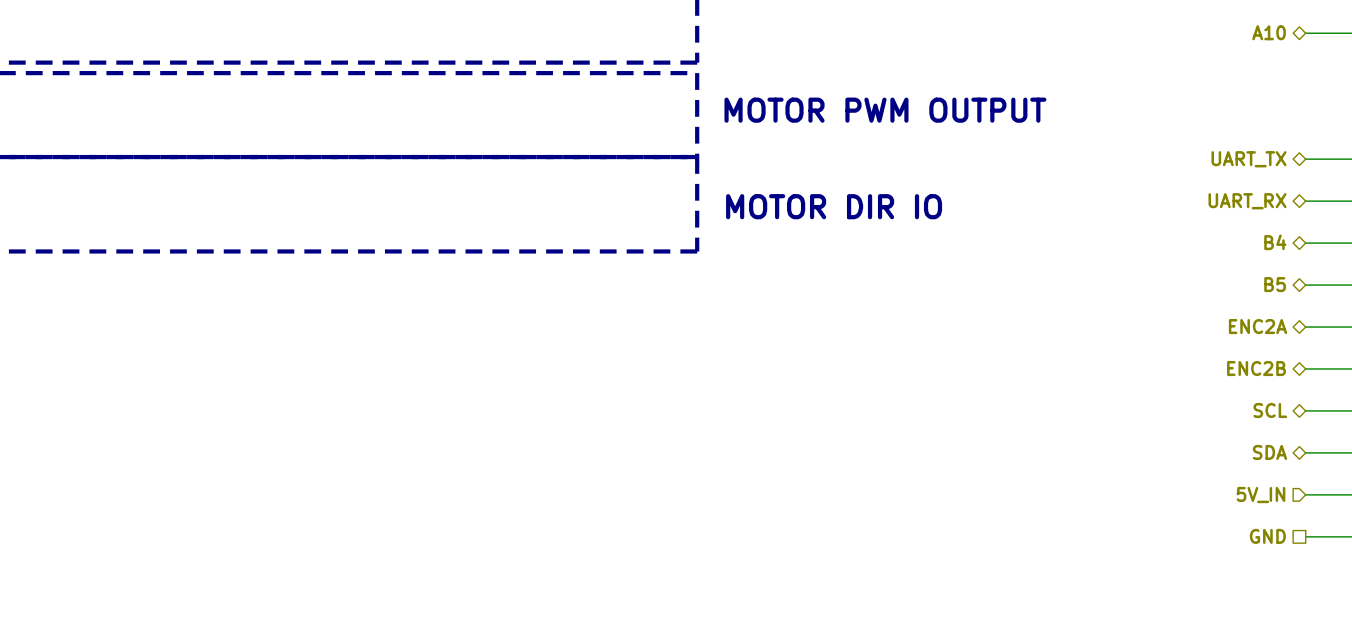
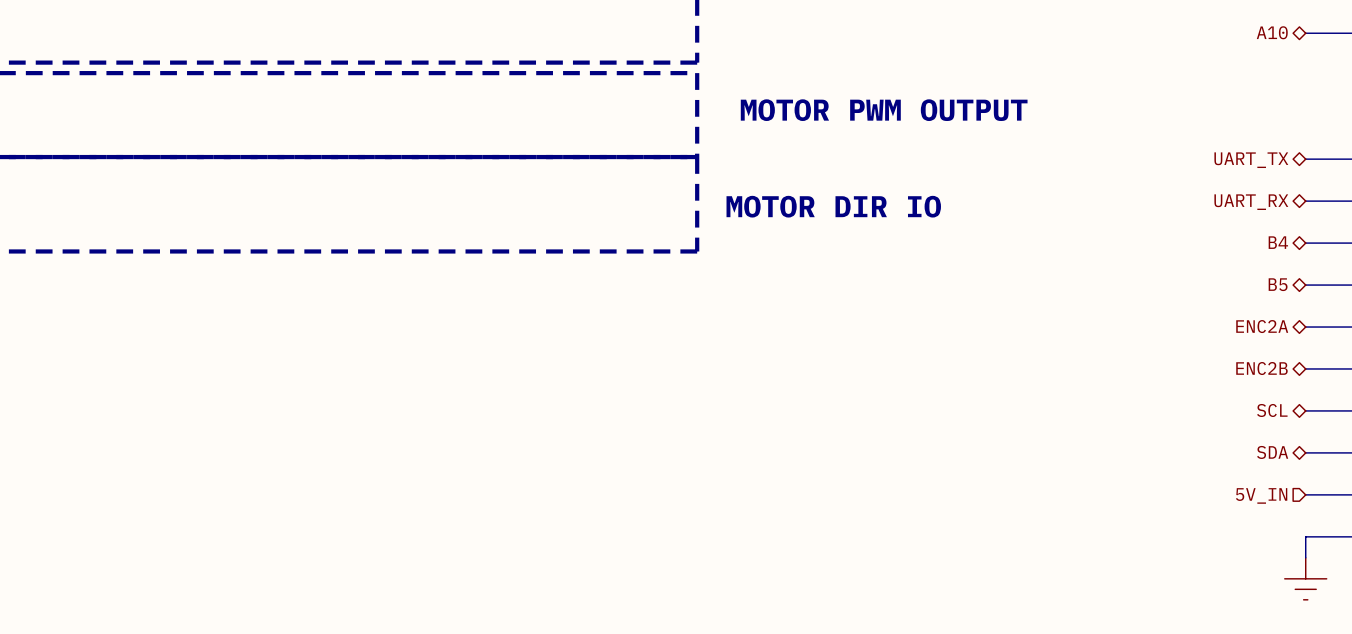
hierarchical label: GND (1267, 536) -> none
wire: none -> (1305, 536) (1305, 557)
power symbol: none -> (1305, 578)

